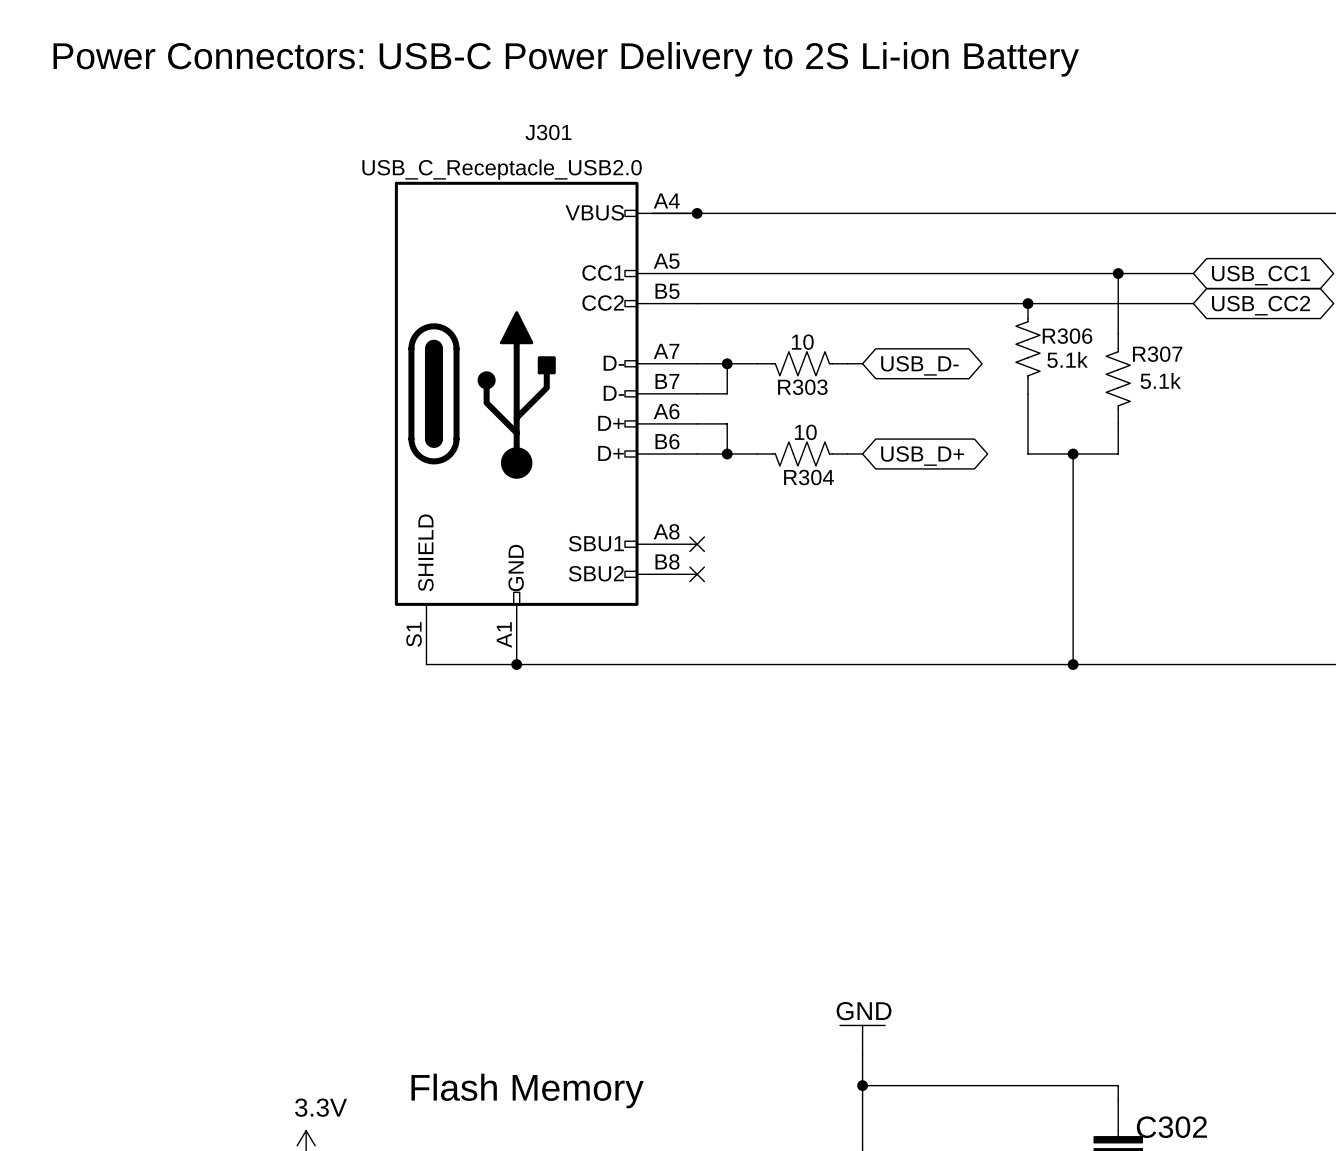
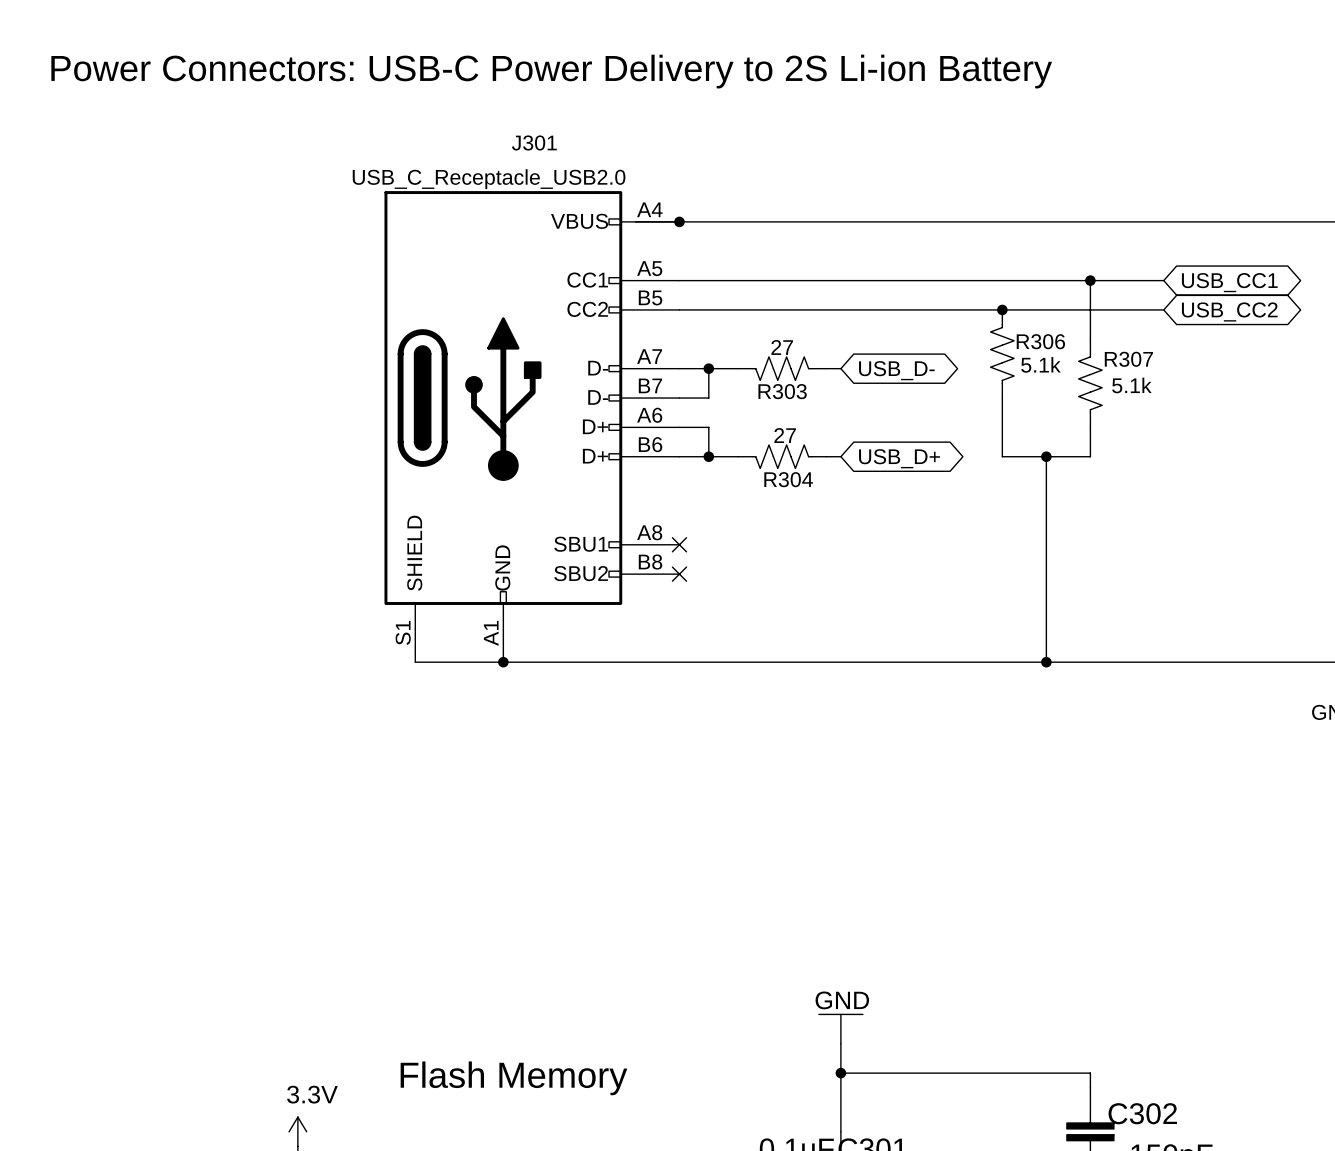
R303 value: 10 (802, 342) -> 27 (782, 347)
R304 value: 10 (805, 432) -> 27 (785, 435)

